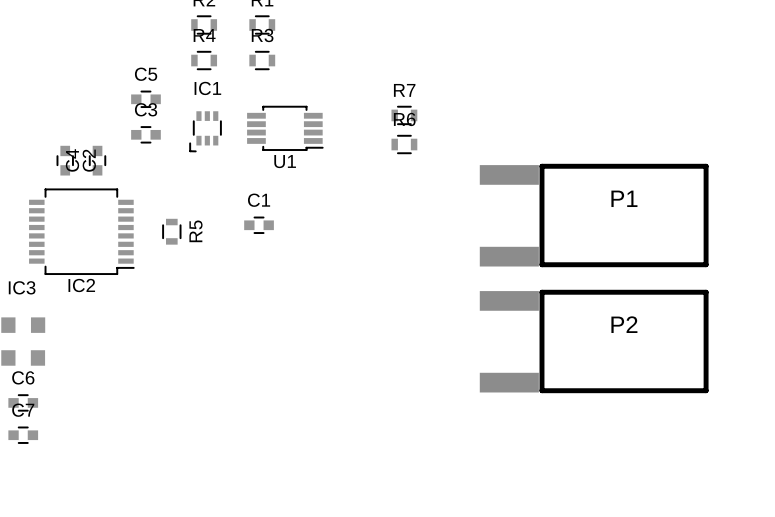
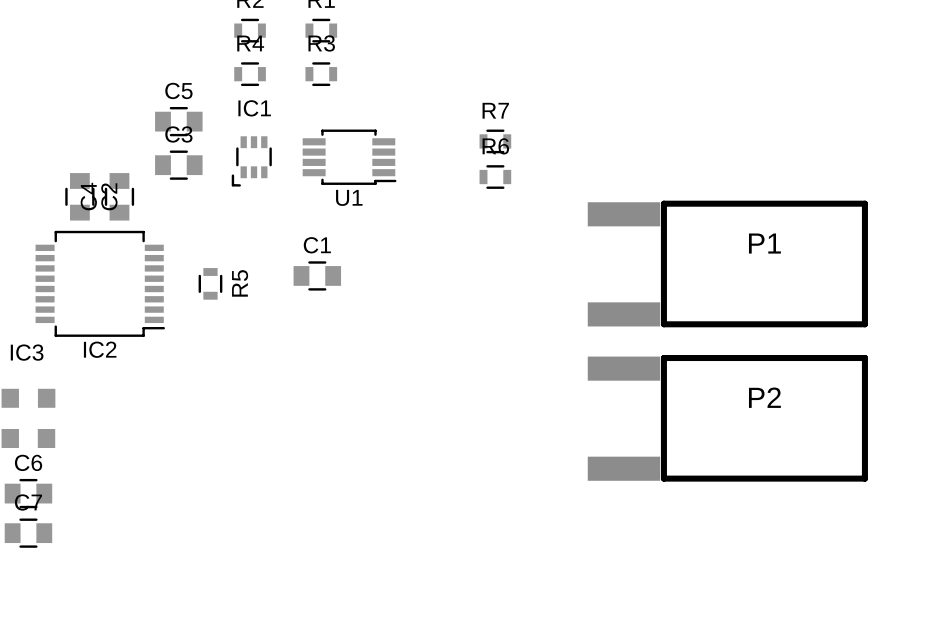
C5 footprint: [131, 90, 161, 109] -> [155, 106, 203, 137]
C3 footprint: [131, 126, 161, 144] -> [155, 150, 203, 180]
C2 footprint: [56, 145, 74, 176] -> [65, 173, 95, 221]
C4 footprint: [88, 145, 107, 176] -> [104, 173, 135, 221]
C1 footprint: [244, 216, 274, 234] -> [293, 261, 342, 291]
C6 footprint: [8, 394, 39, 412] -> [4, 478, 53, 509]
C7 footprint: [8, 426, 39, 444] -> [4, 518, 53, 548]

